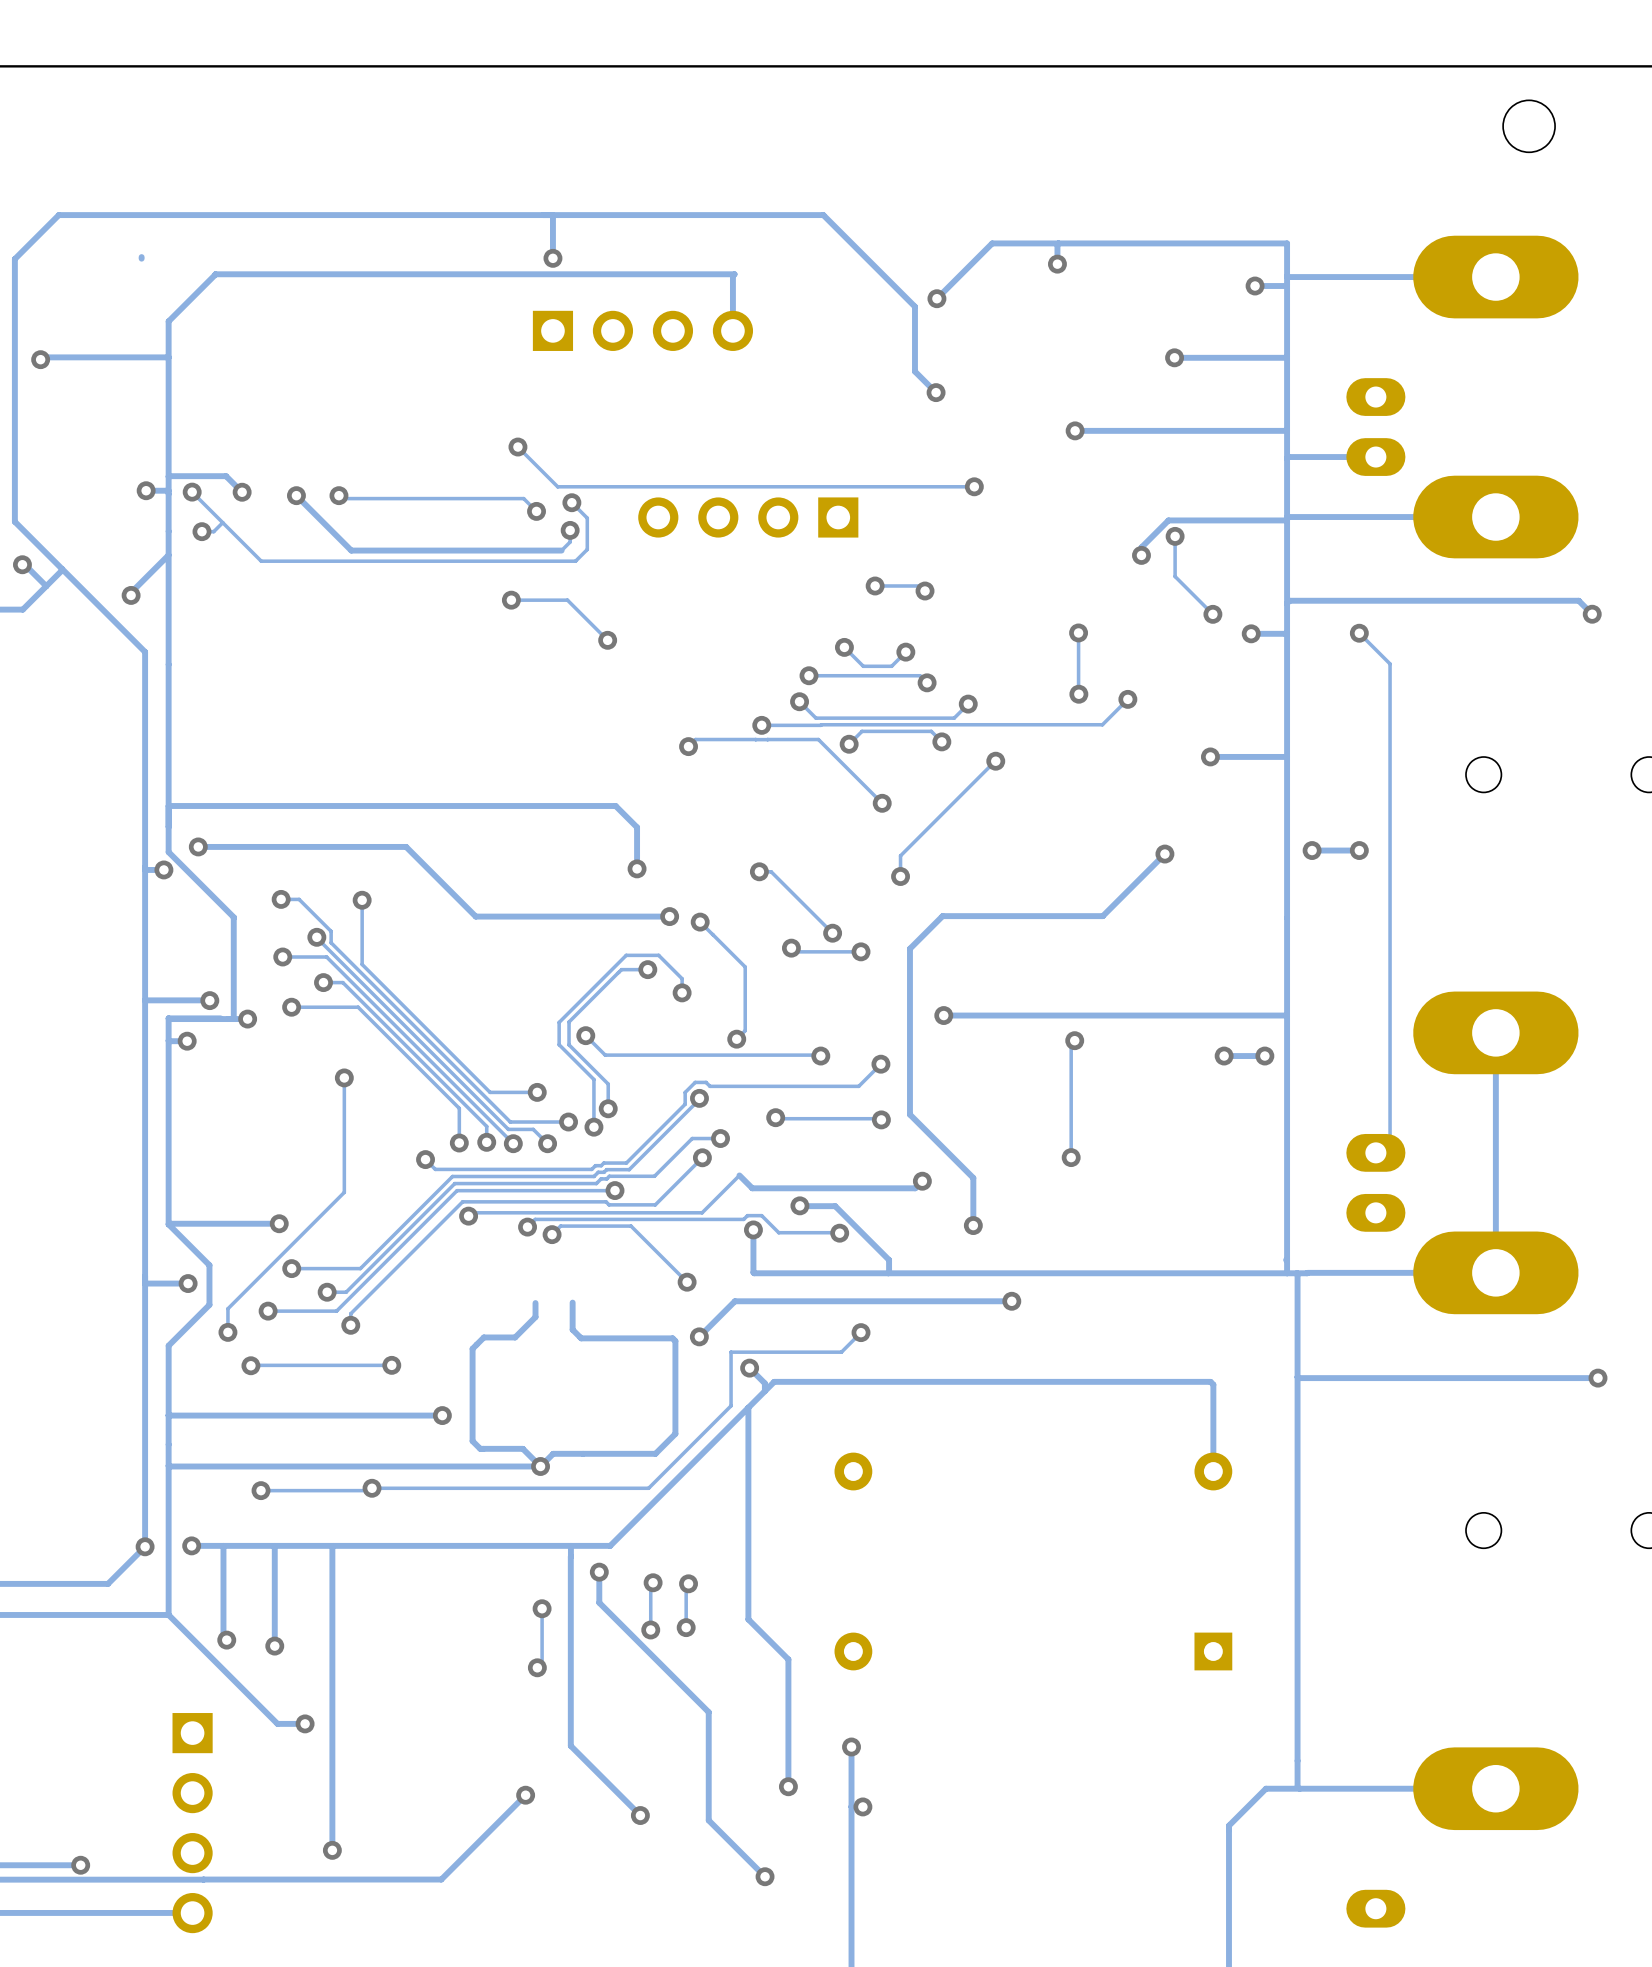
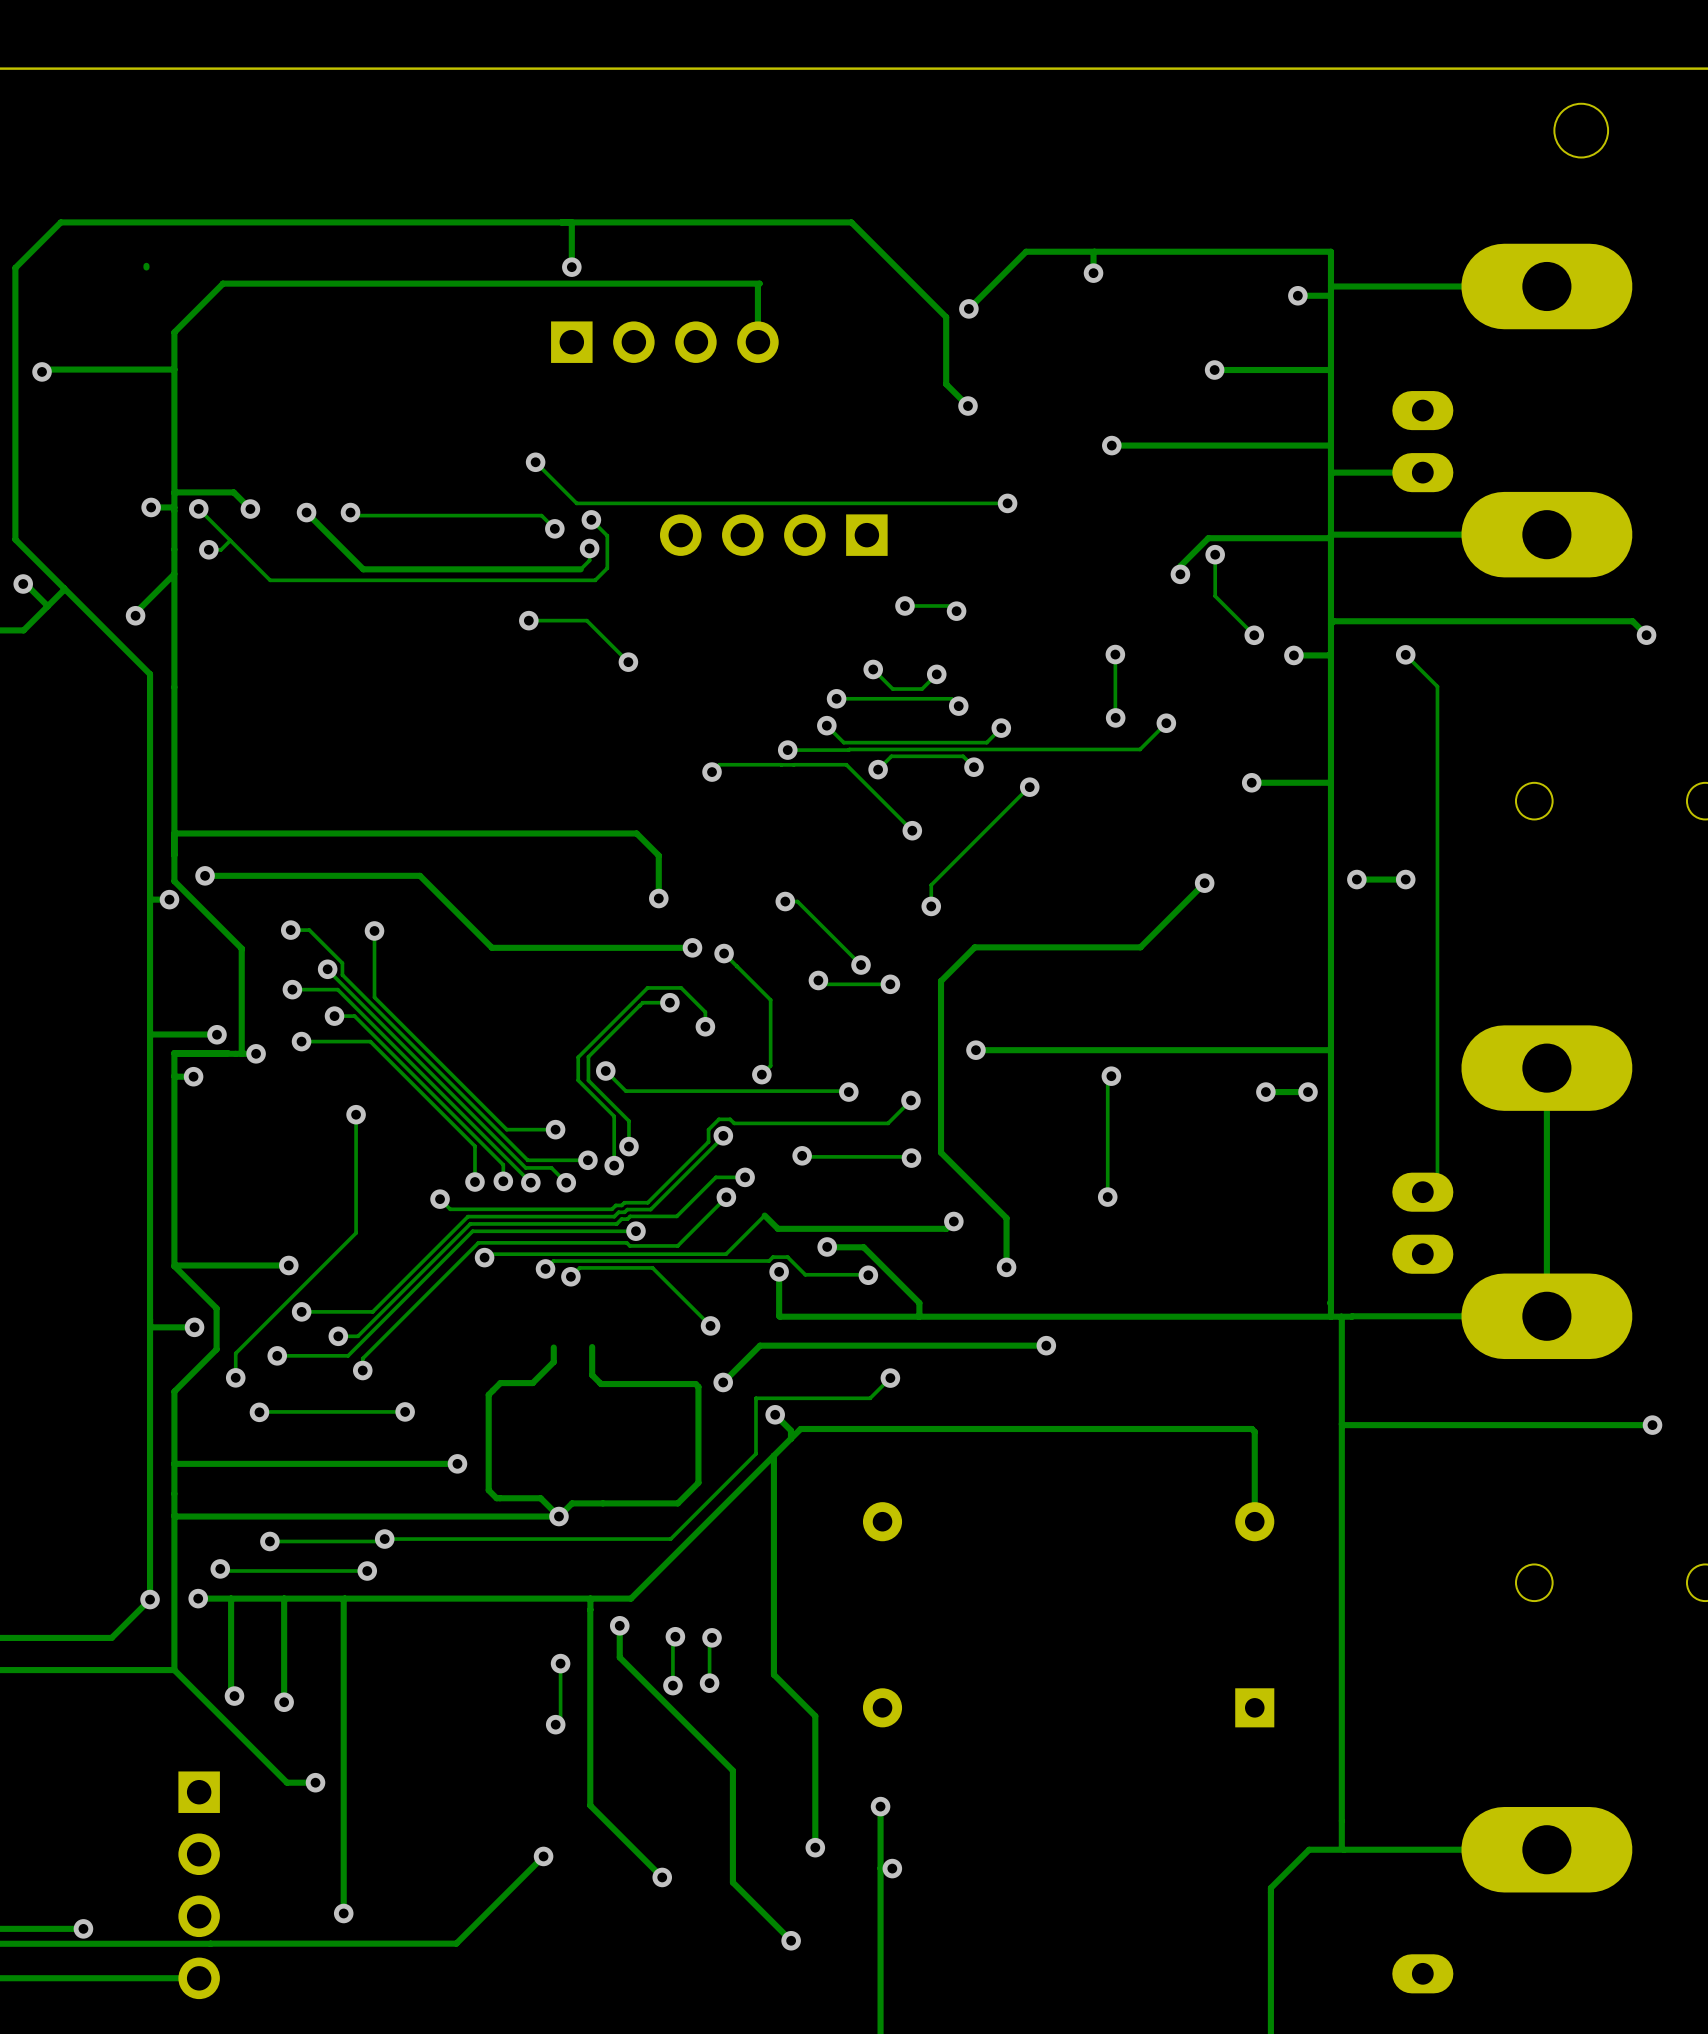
track: none -> (220, 1568) (222, 1571) (367, 1571)
via: none -> (220, 1568)
via: none -> (367, 1571)

